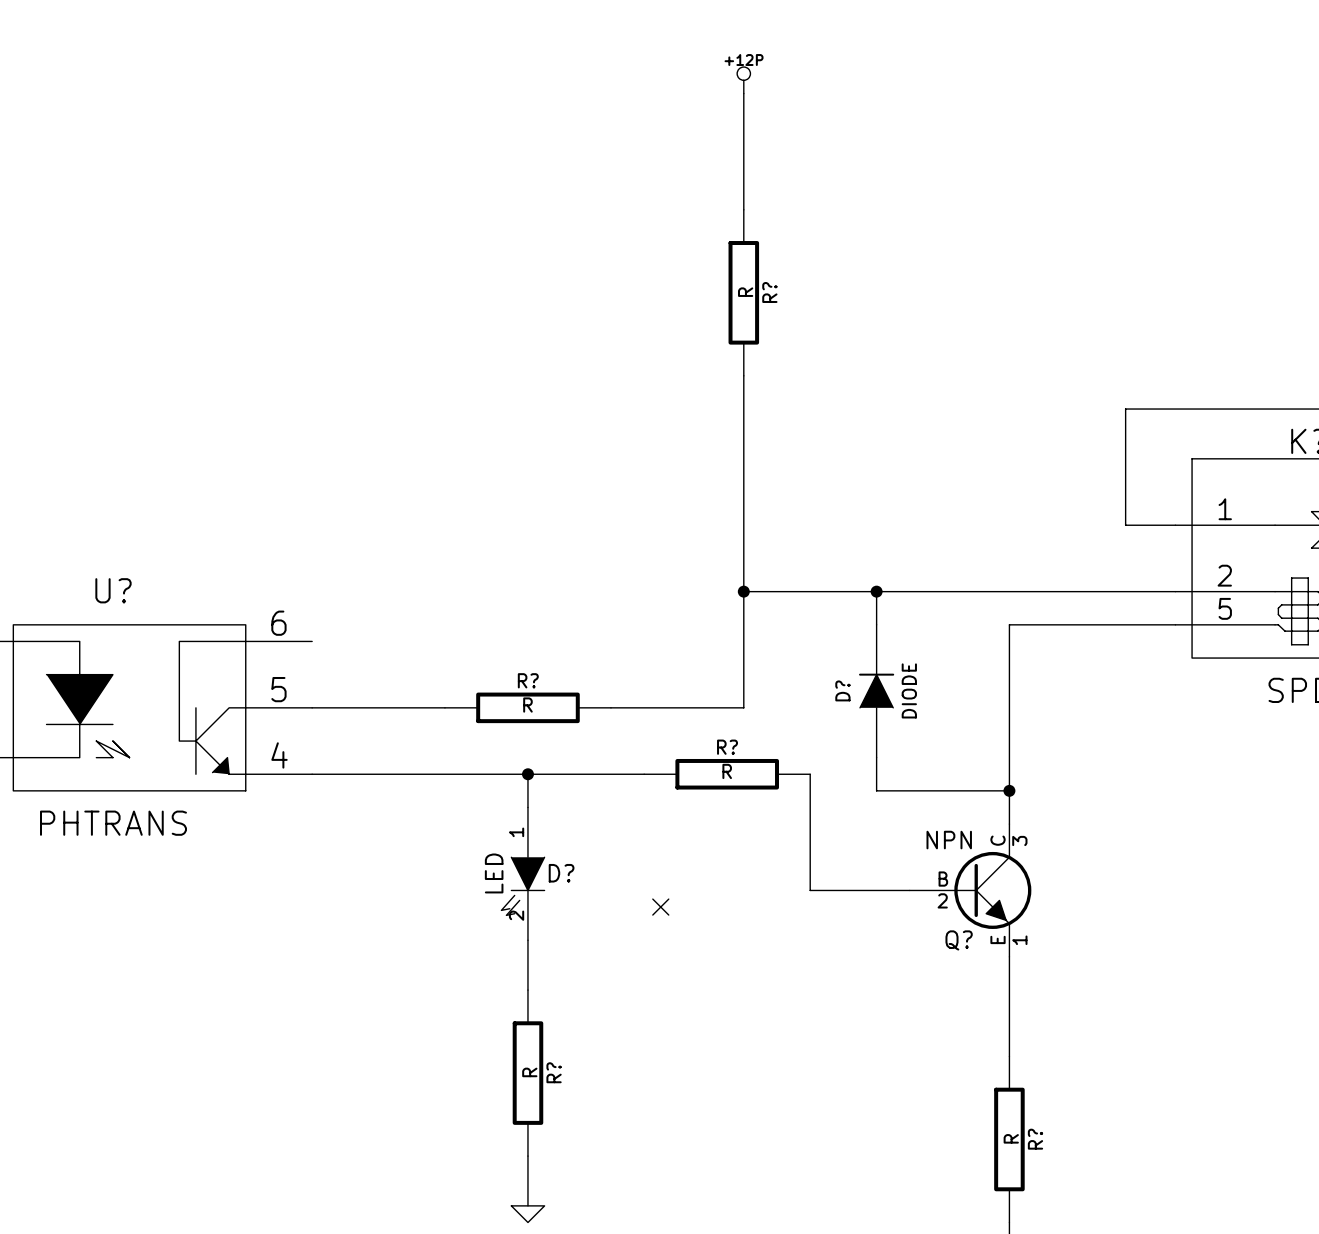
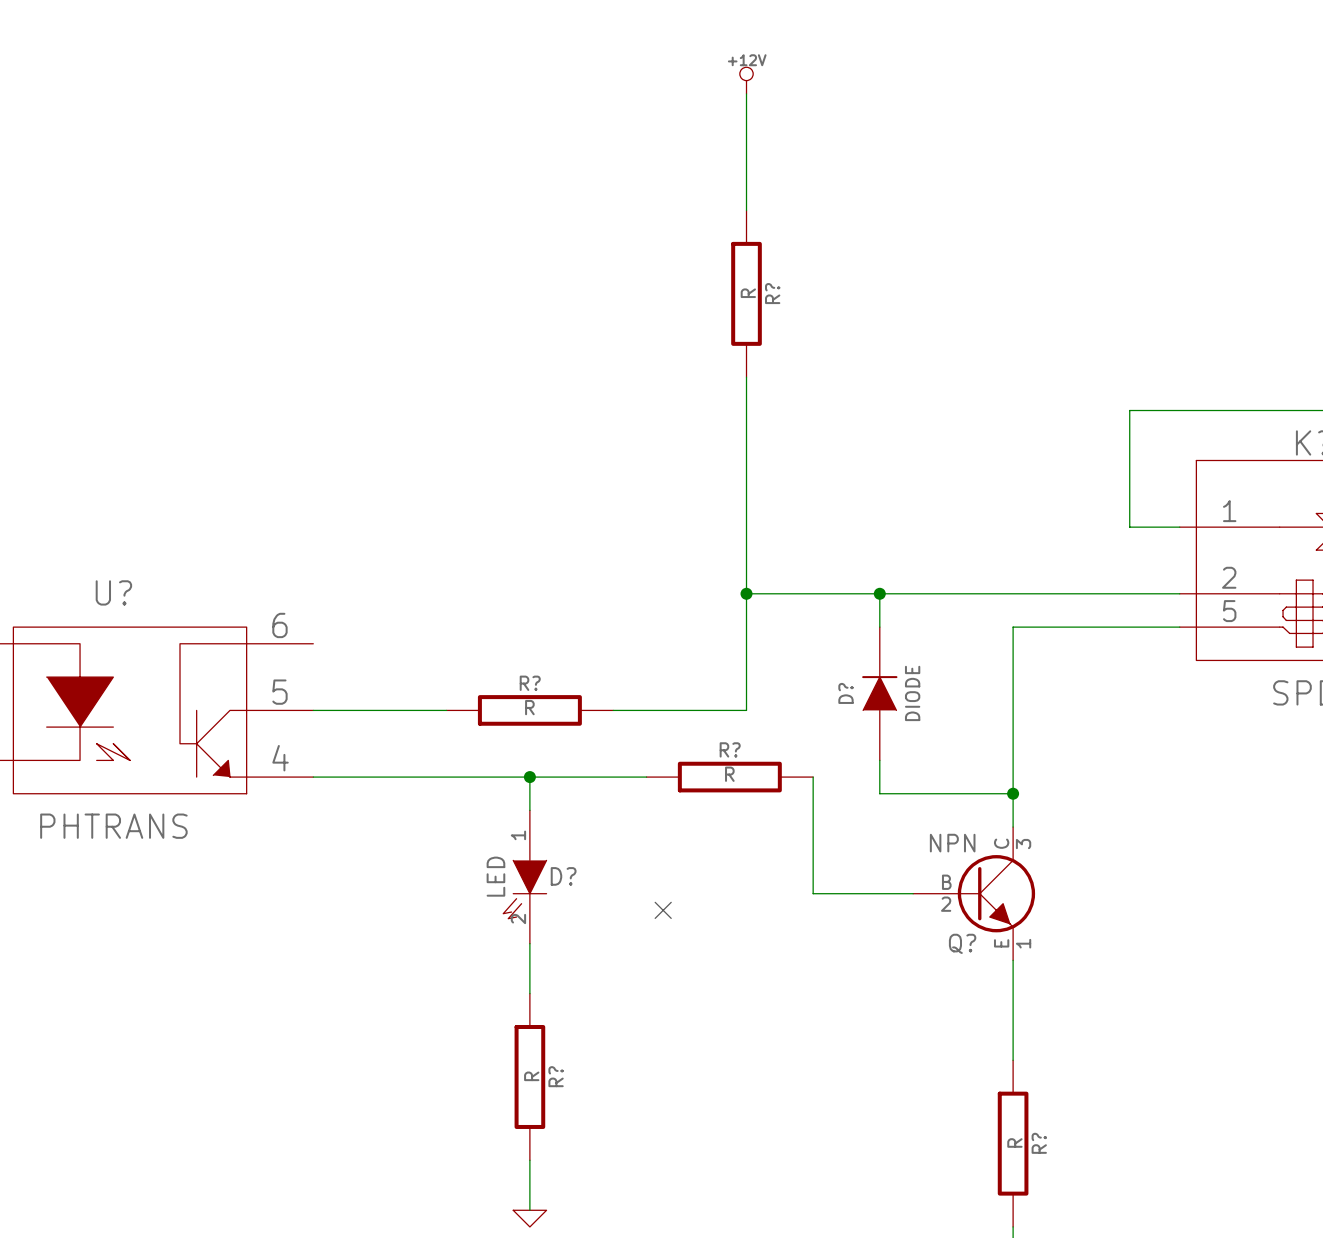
power symbol: +12P (743, 80) -> +12V (746, 80)

